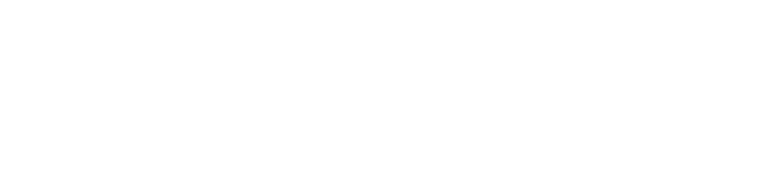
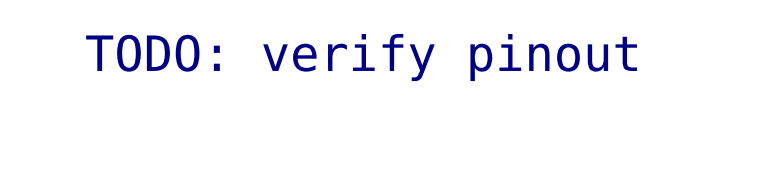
text: none -> TODO: verify pinout (361, 57)

